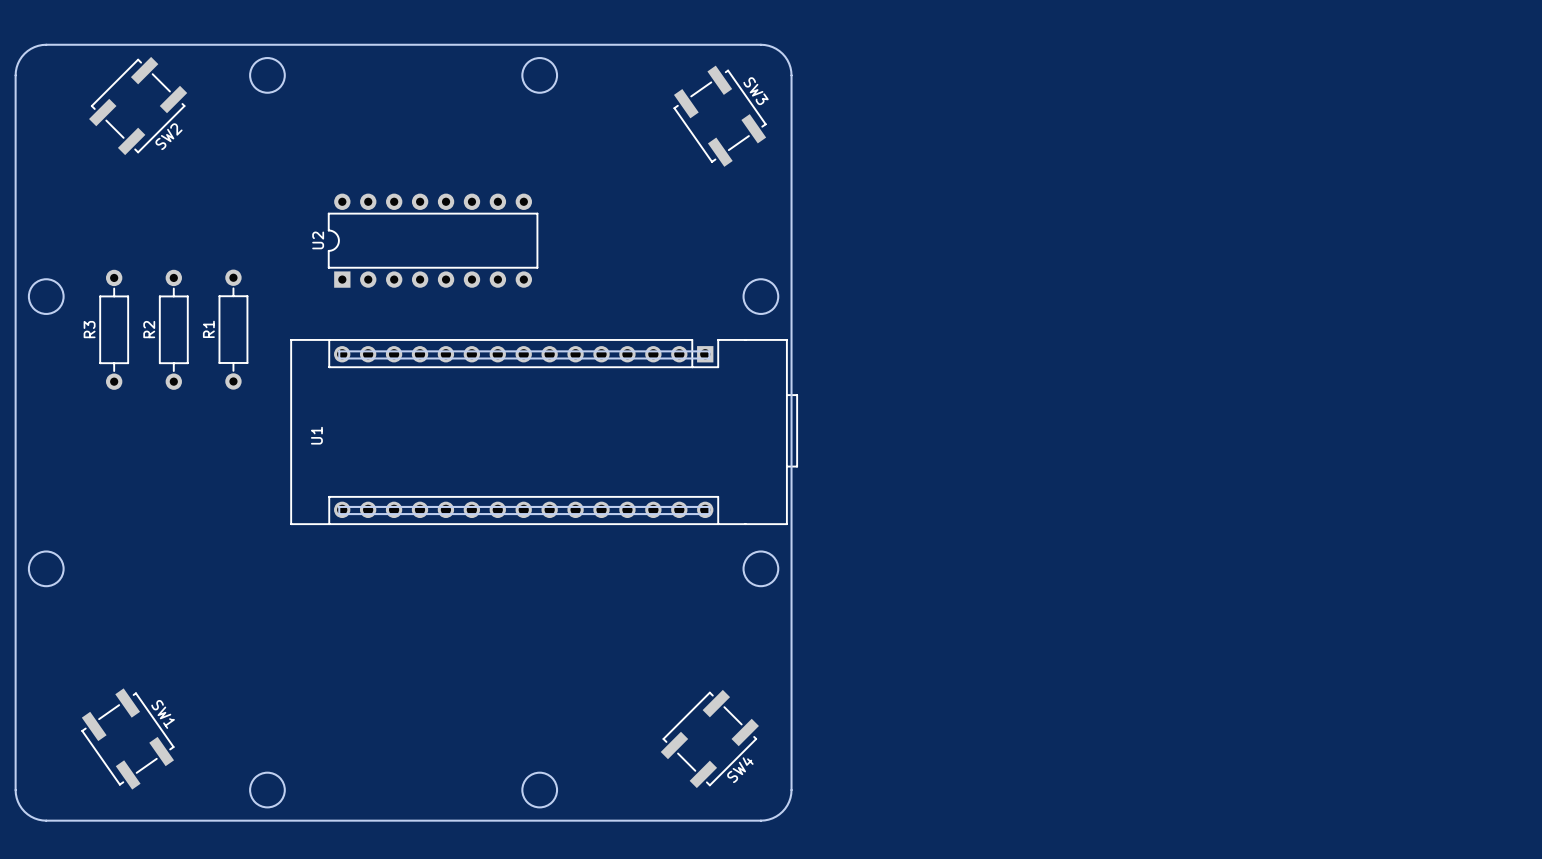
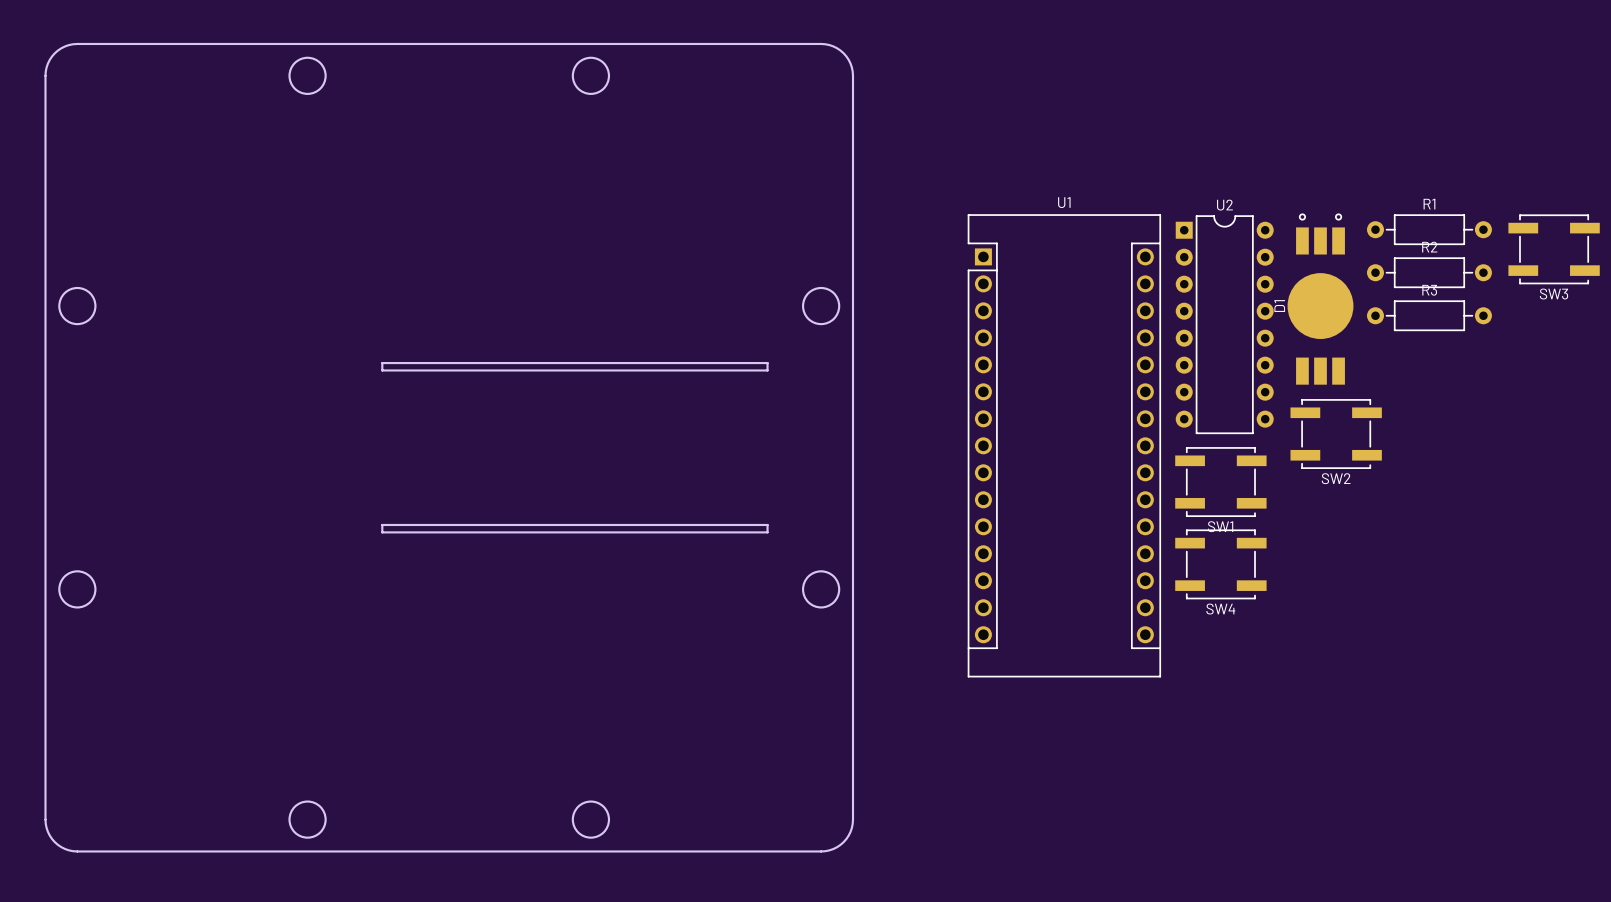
SW2 rotation: 0° (138, 106) -> 45° clockwise (1336, 434)
SW2 position: (138, 106) -> (1336, 434)
SW3 rotation: 0° (720, 116) -> 125° clockwise (1554, 249)
SW3 position: (720, 116) -> (1554, 249)
U2 rotation: 0° (433, 240) -> 90° clockwise (1224, 324)
U2 position: (433, 240) -> (1224, 324)
D1: none -> (1320, 299)
R3 rotation: 0° (114, 329) -> 90° clockwise (1429, 315)
R3 position: (114, 329) -> (1429, 315)
R2 rotation: 0° (173, 329) -> 90° clockwise (1429, 272)
R2 position: (173, 329) -> (1429, 272)
R1 rotation: 0° (233, 329) -> 90° clockwise (1429, 229)
R1 position: (233, 329) -> (1429, 229)
U1 footprint: [290, 339, 798, 525] -> [967, 214, 1161, 678]
U1 name position: U1 (316, 435) -> U1 (1064, 202)
SW1 rotation: 0° (127, 738) -> 125° clockwise (1220, 482)
SW1 position: (127, 738) -> (1220, 482)
SW4 rotation: 0° (709, 738) -> 45° clockwise (1220, 564)
SW4 position: (709, 738) -> (1220, 564)

